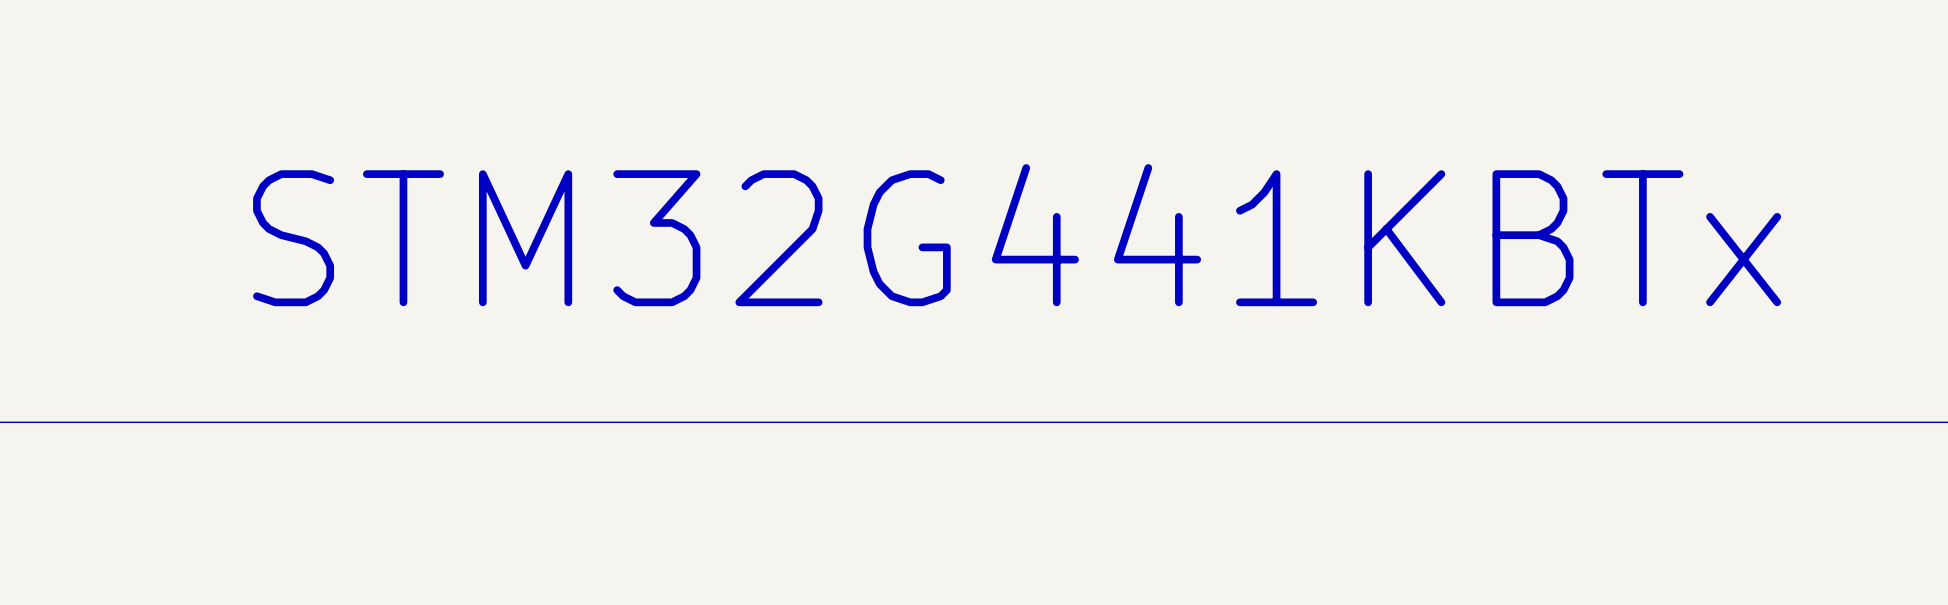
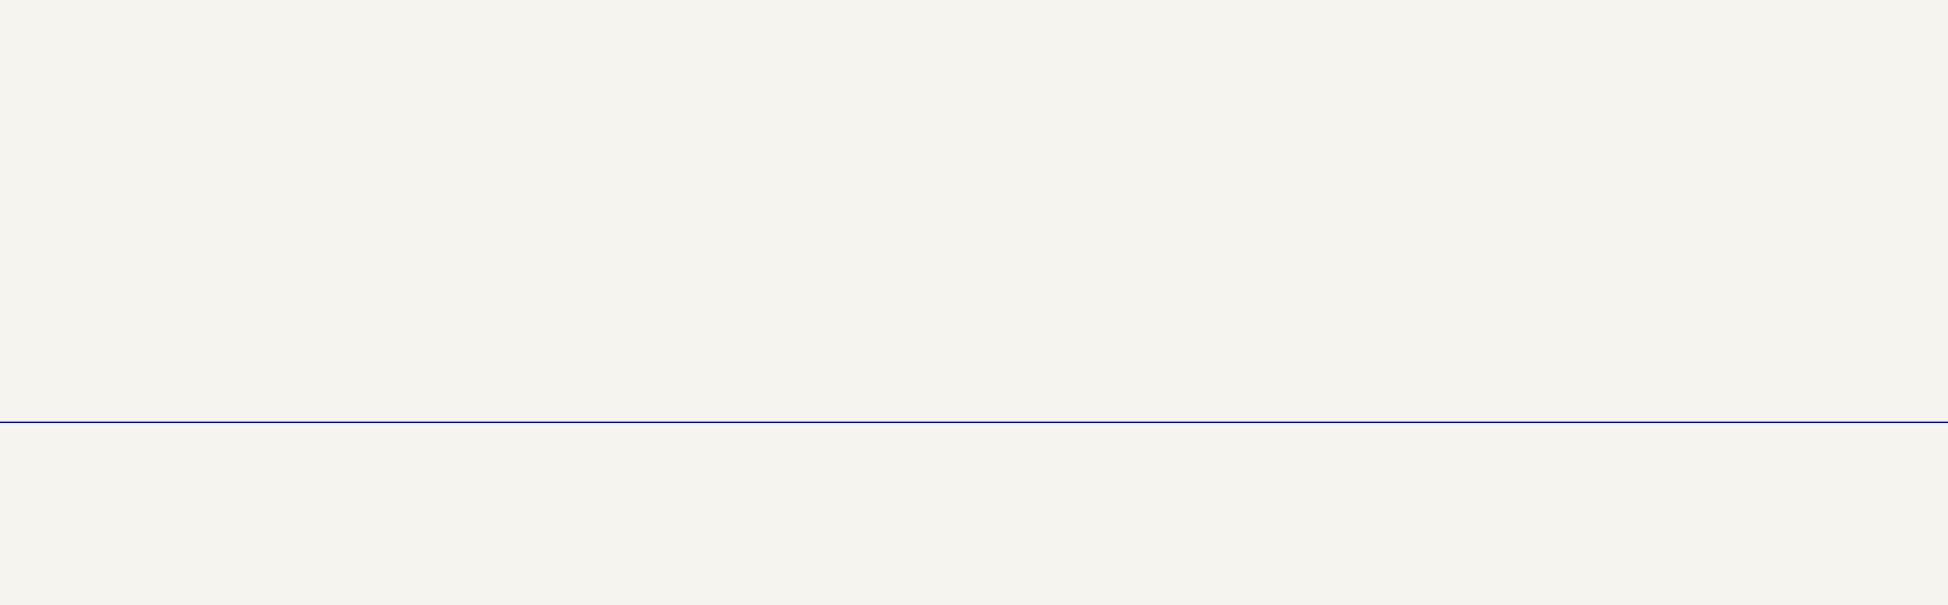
text: STM32G441KBTx (1017, 235) -> none

